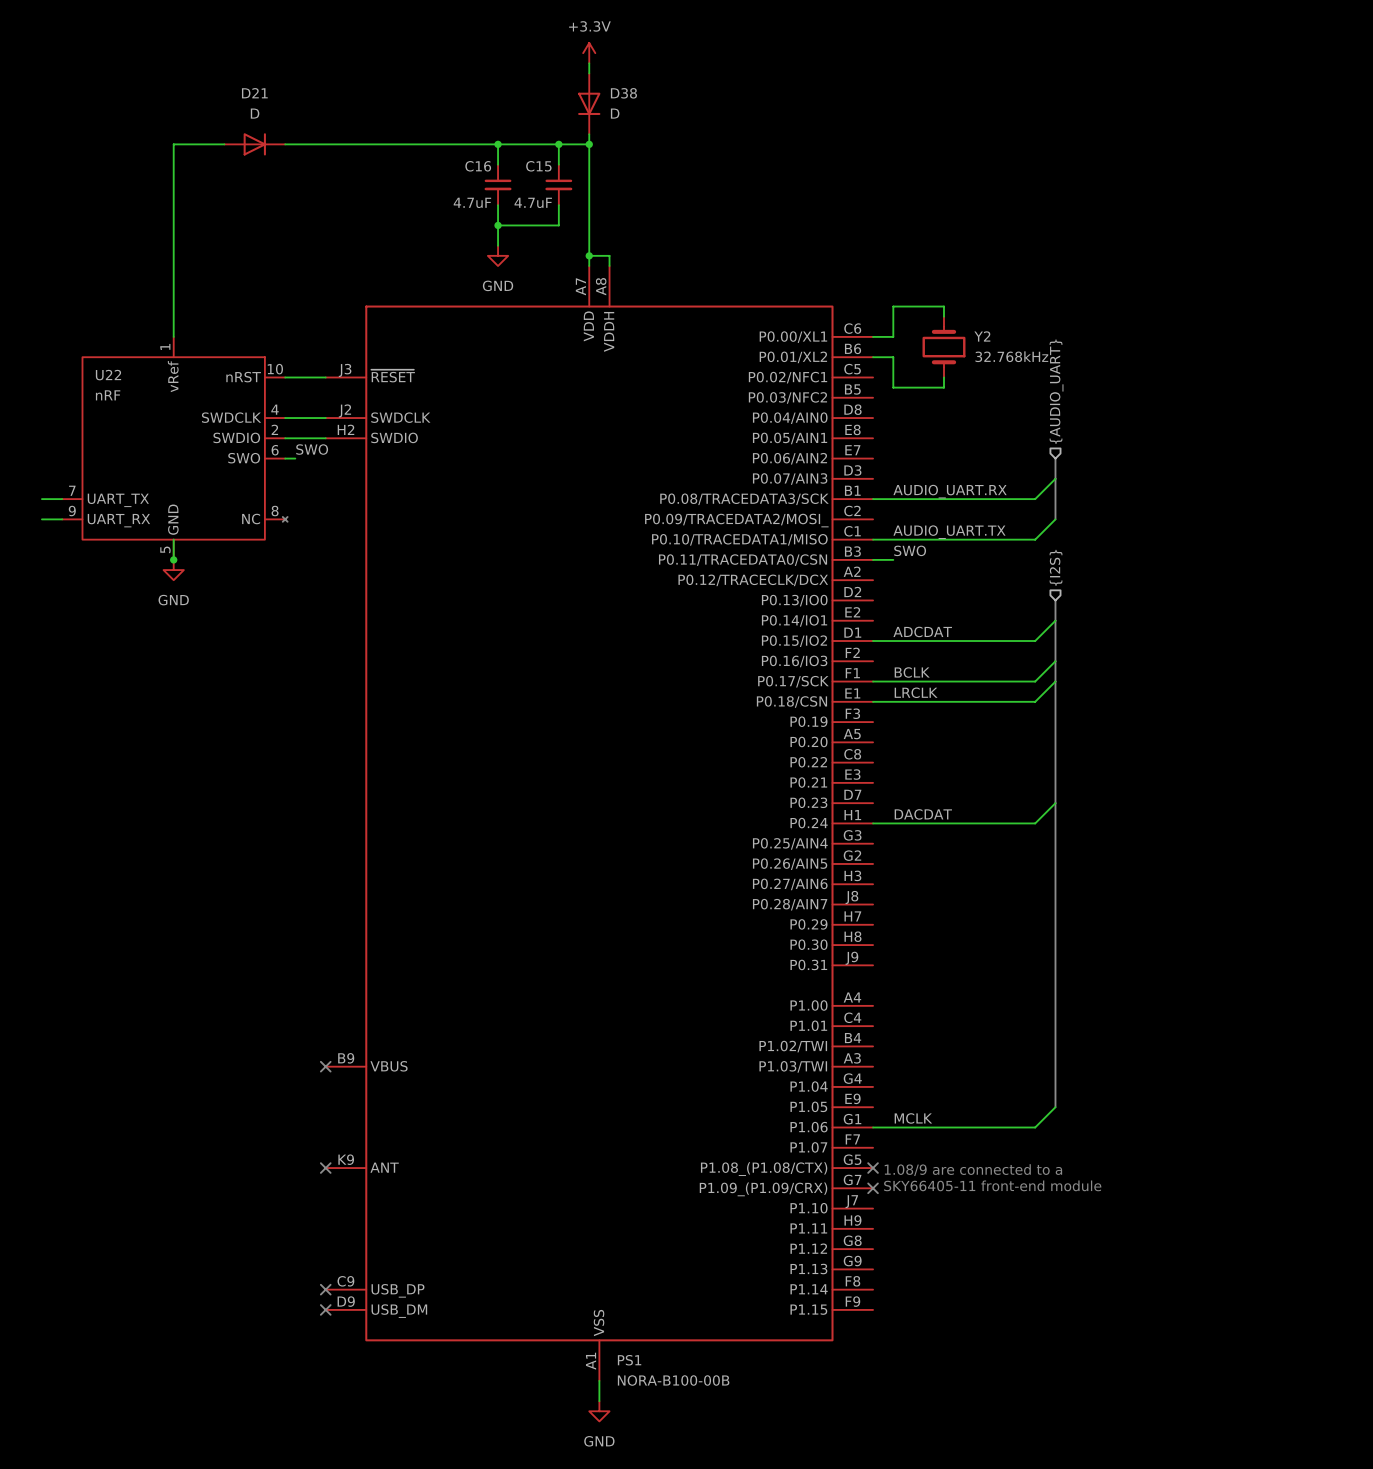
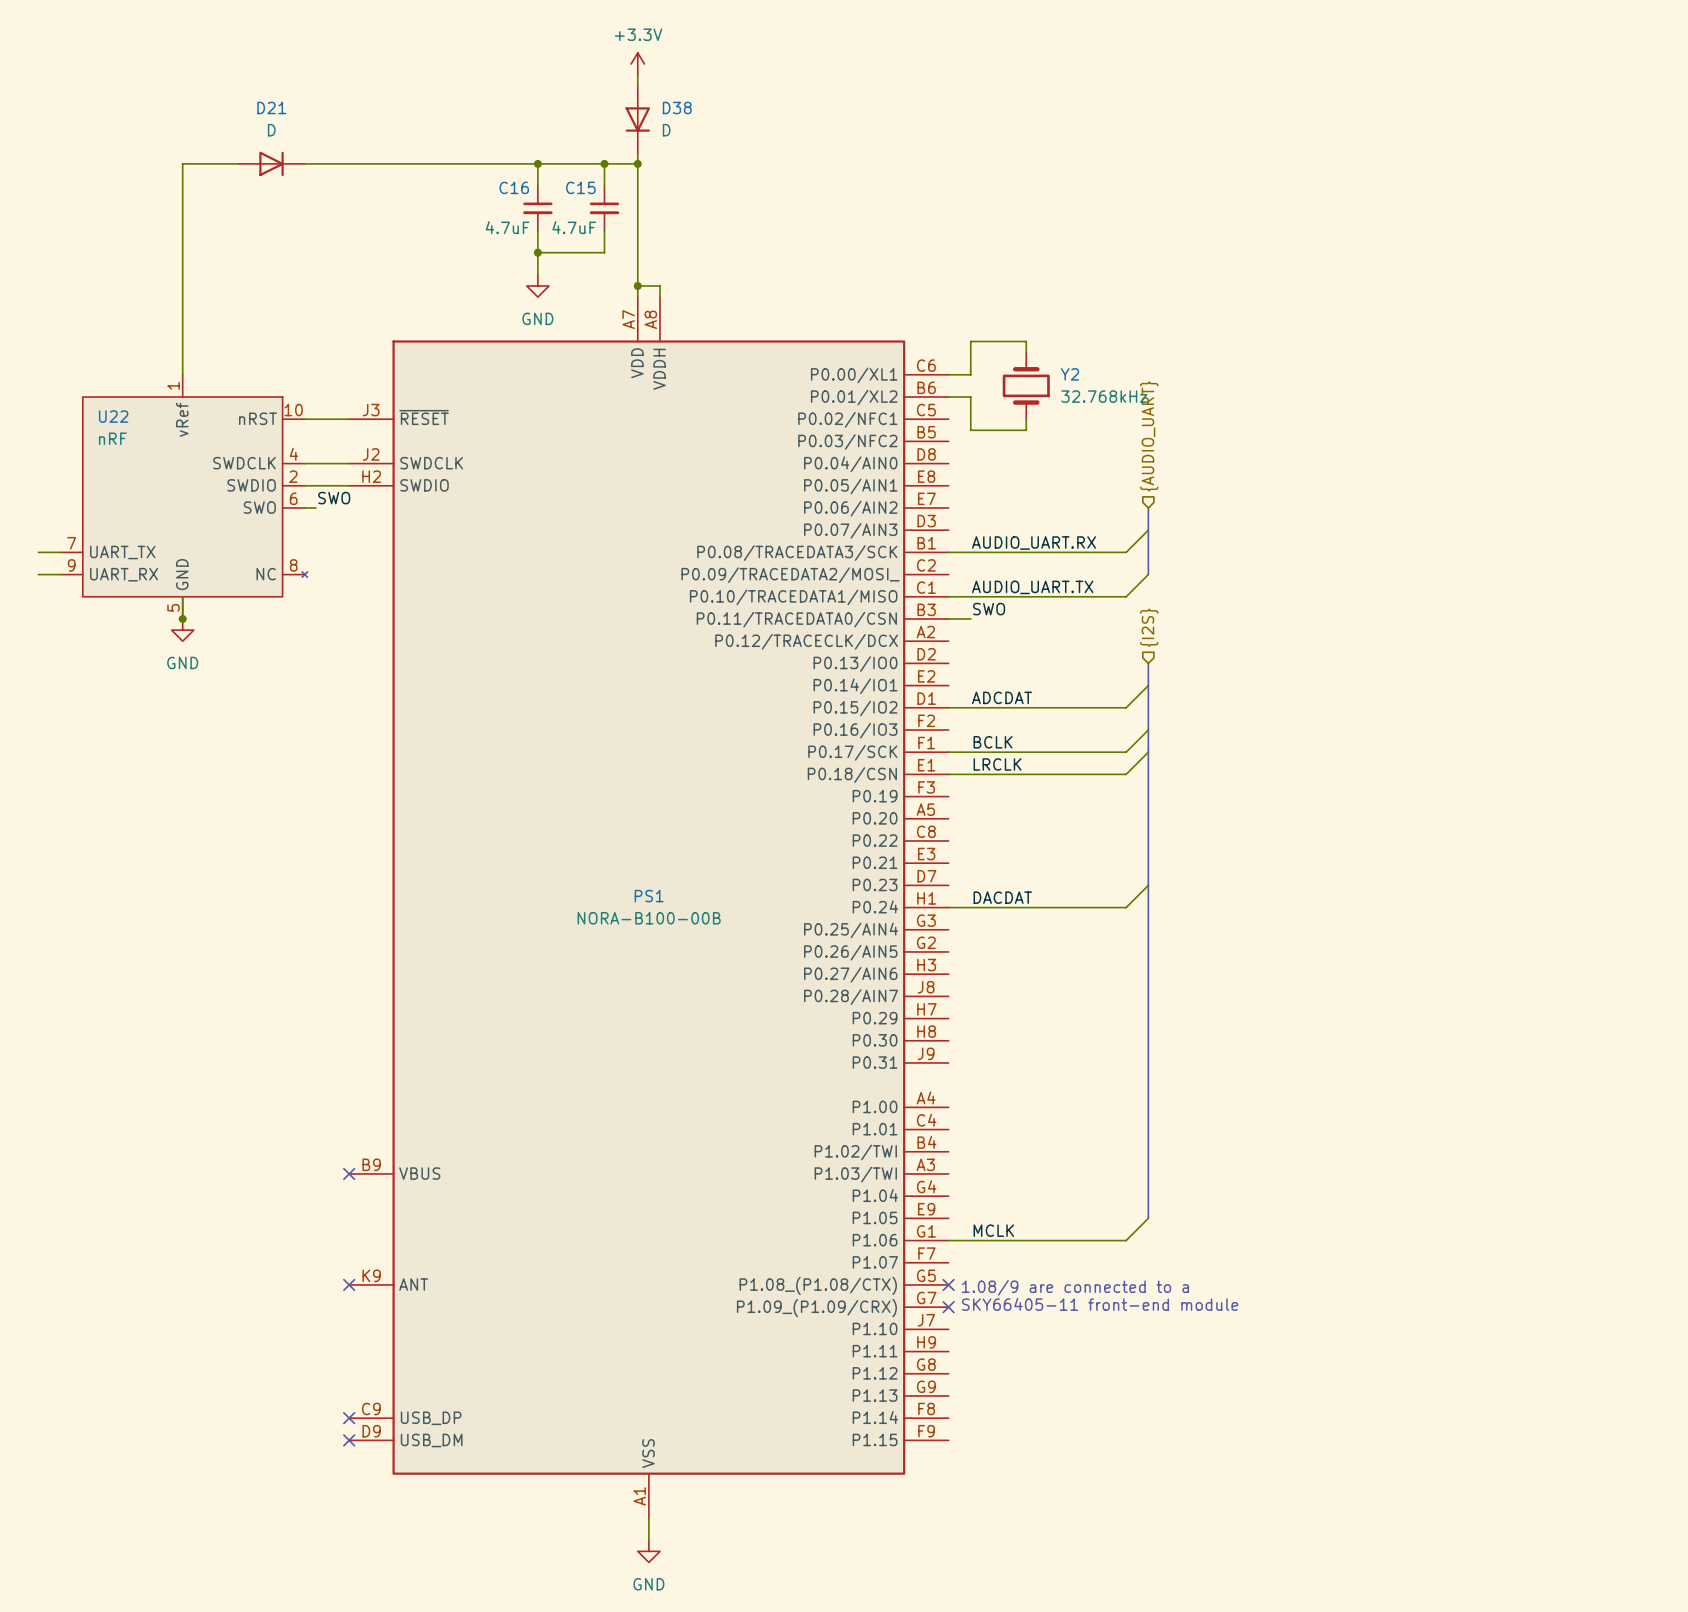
PS1 name position: PS1 (629, 1360) -> PS1 (649, 896)
PS1 value position: NORA-B100-00B (673, 1380) -> NORA-B100-00B (649, 918)

